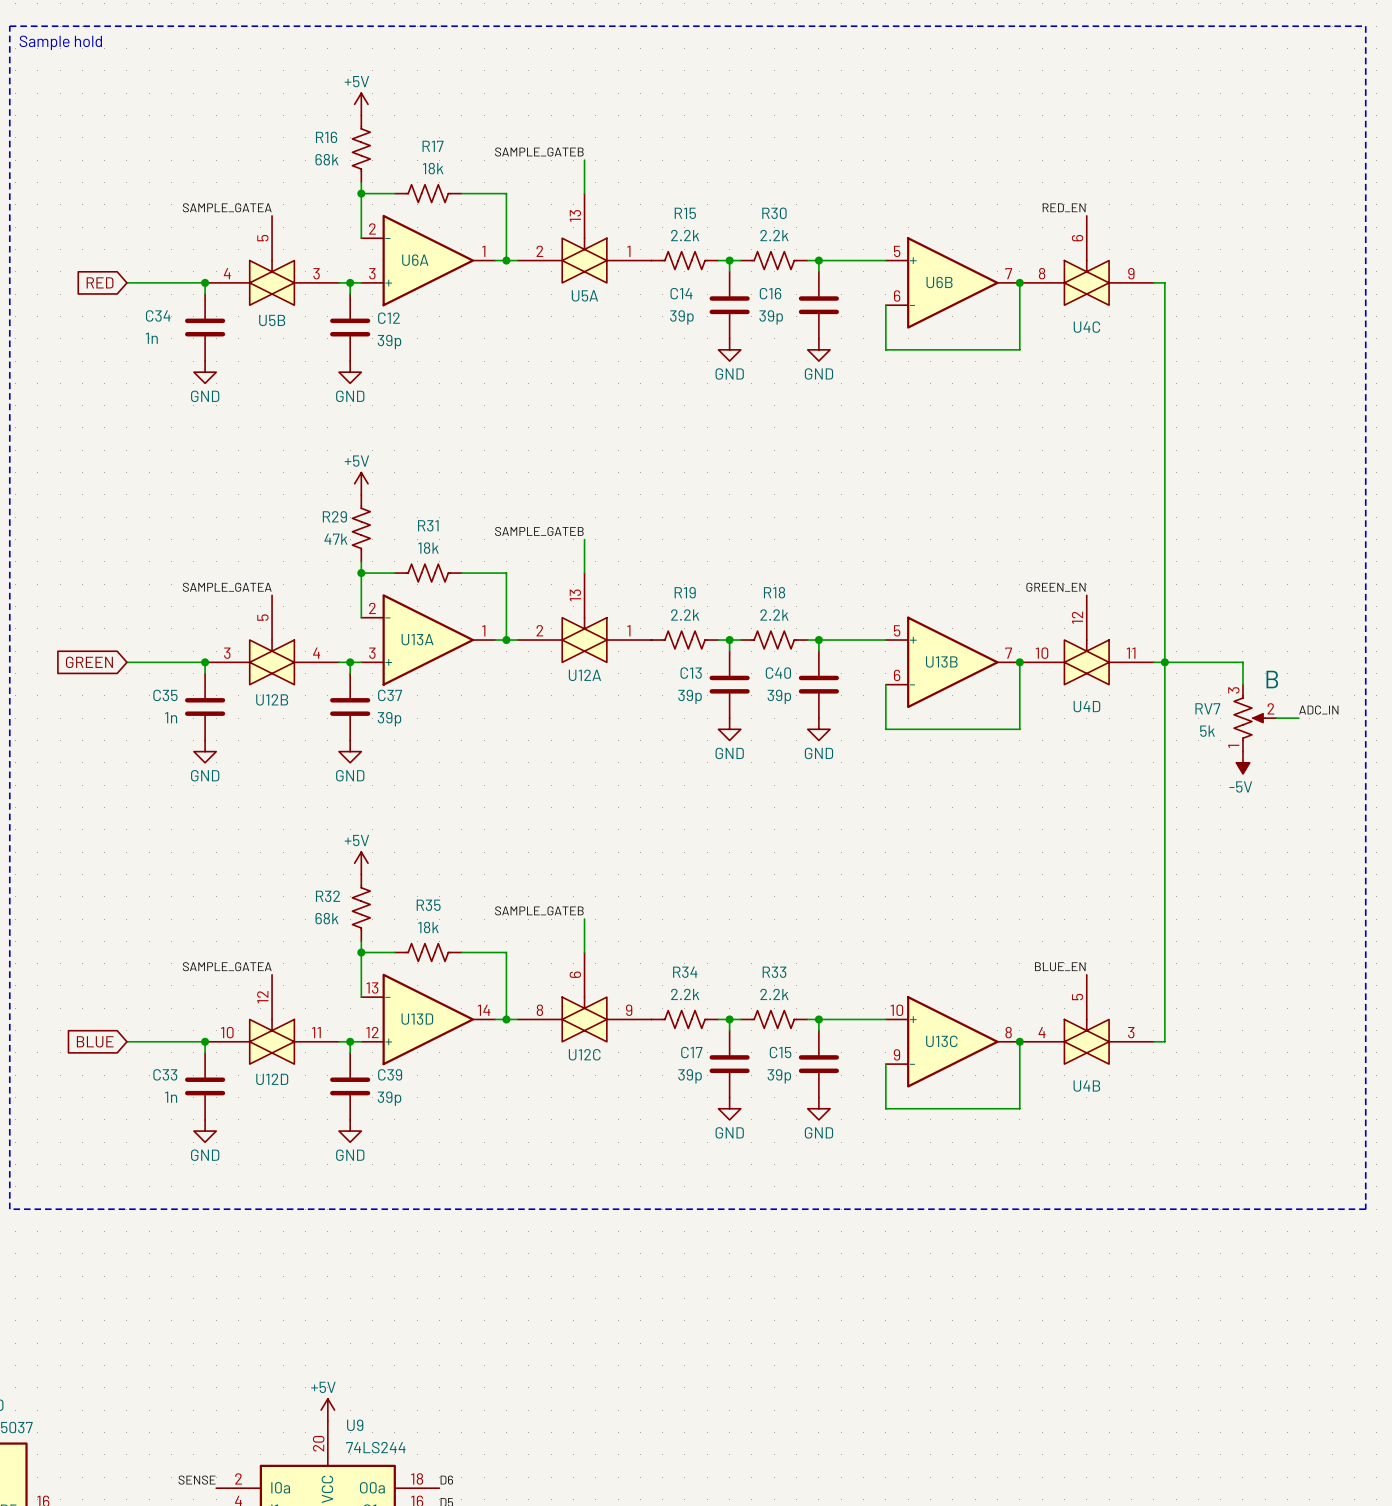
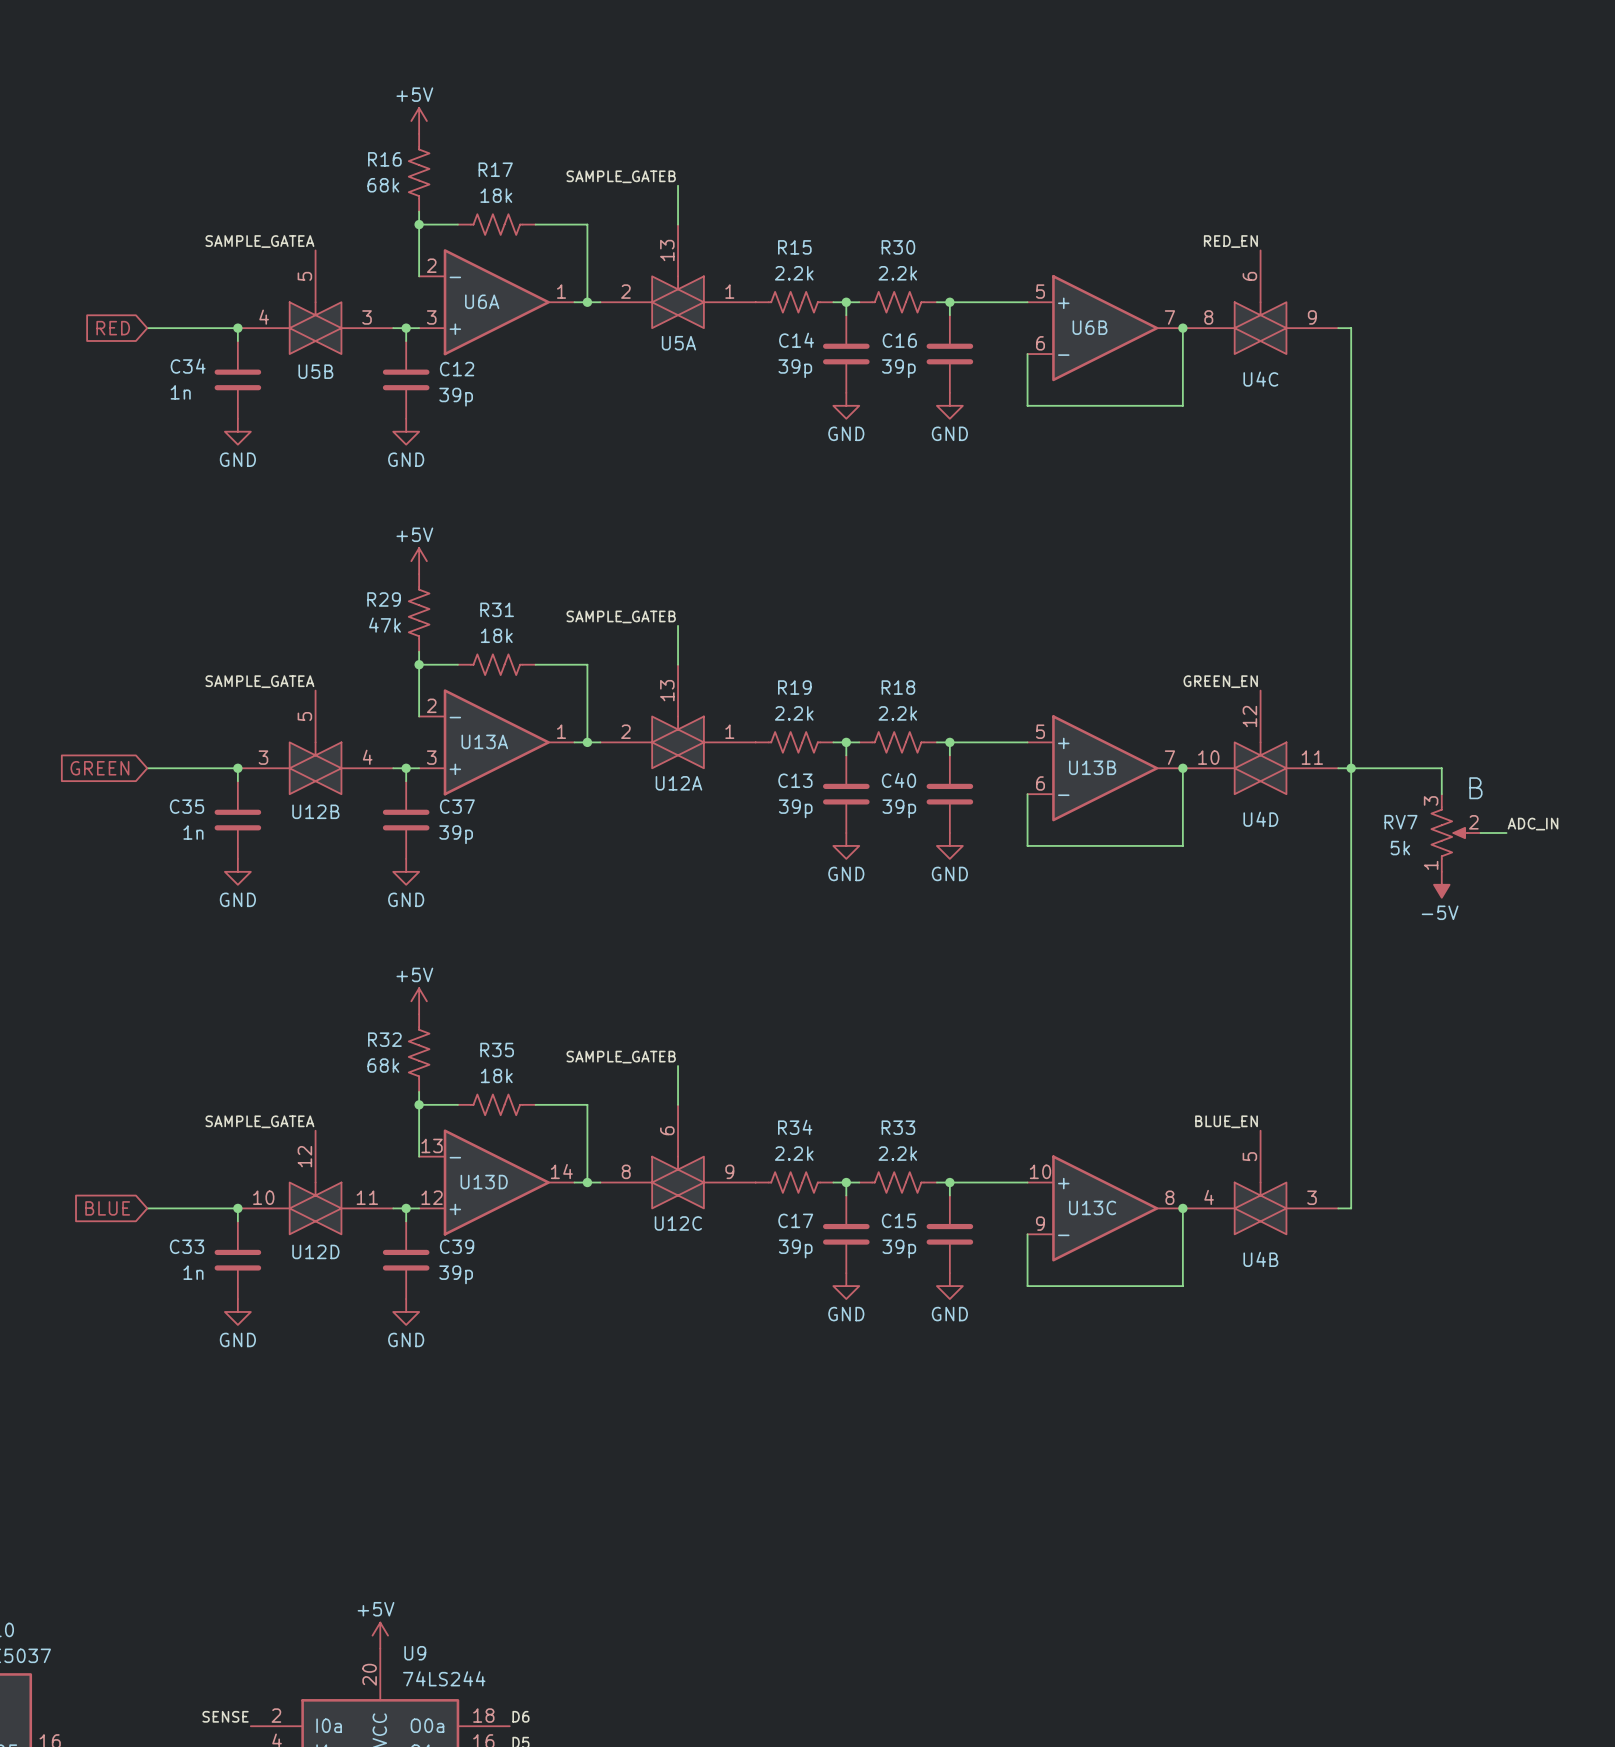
line: (9, 26) (1365, 26) (1365, 1209) (9, 1209) (9, 26) -> none
text: Sample hold (60, 42) -> none

